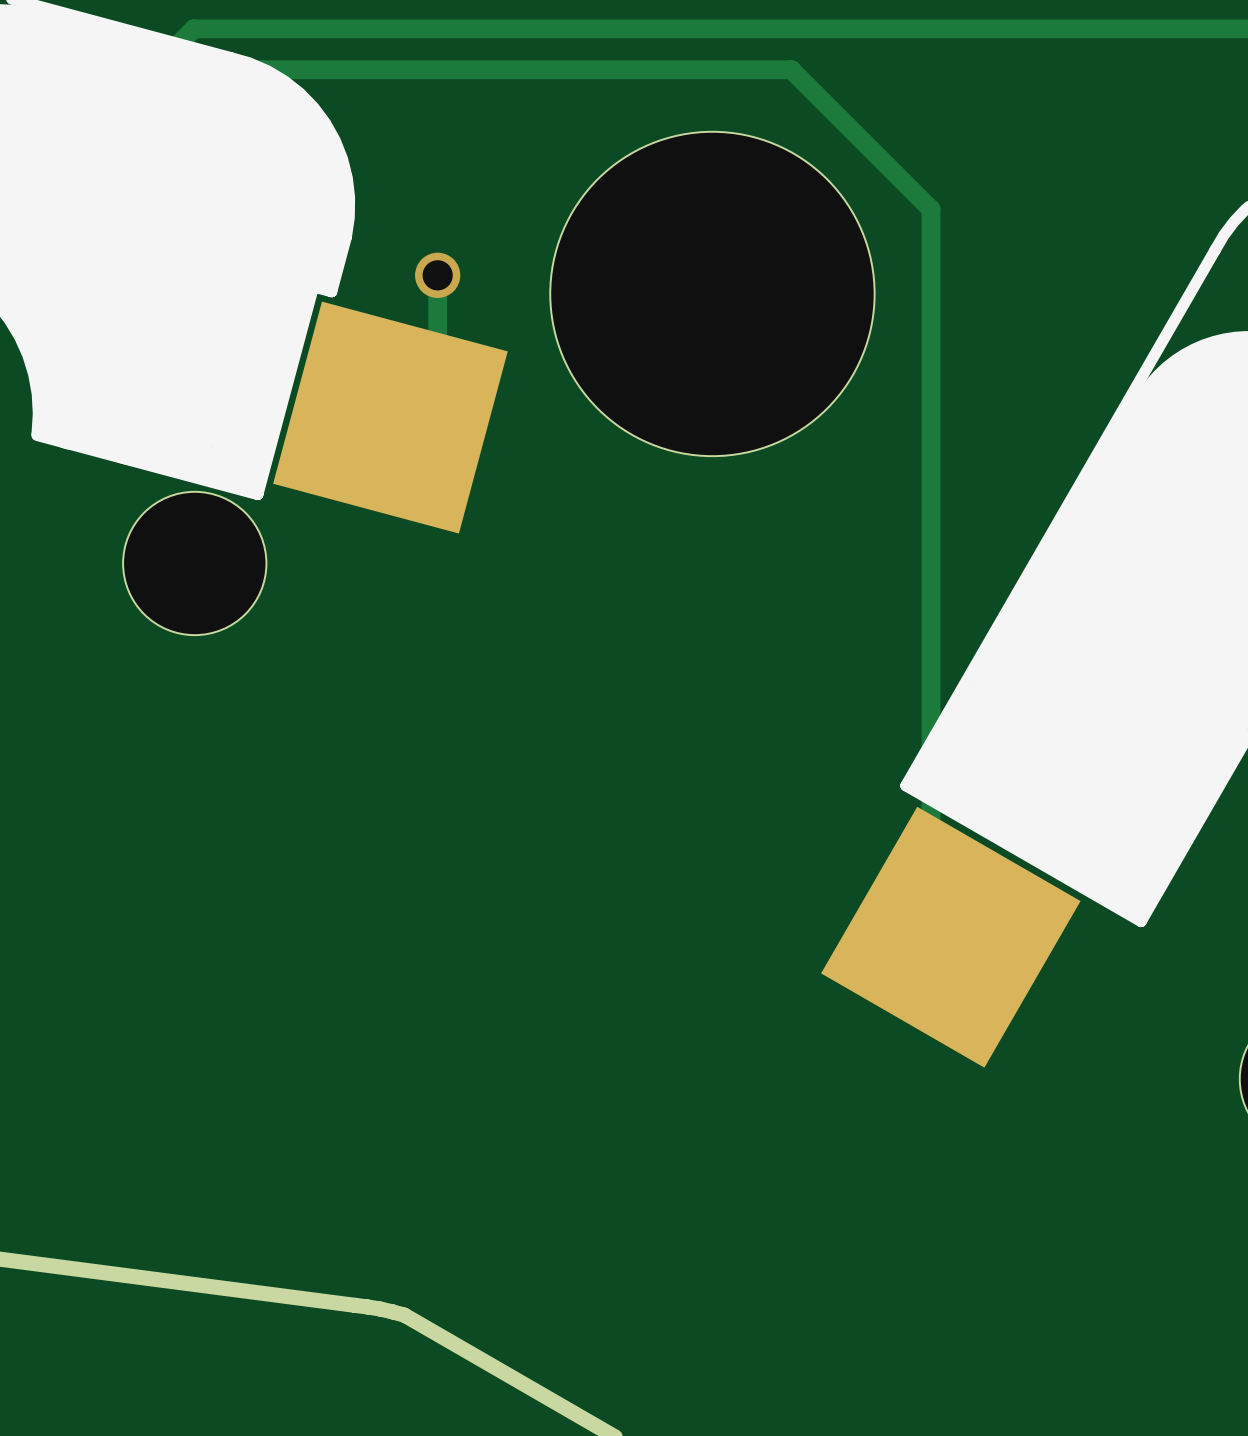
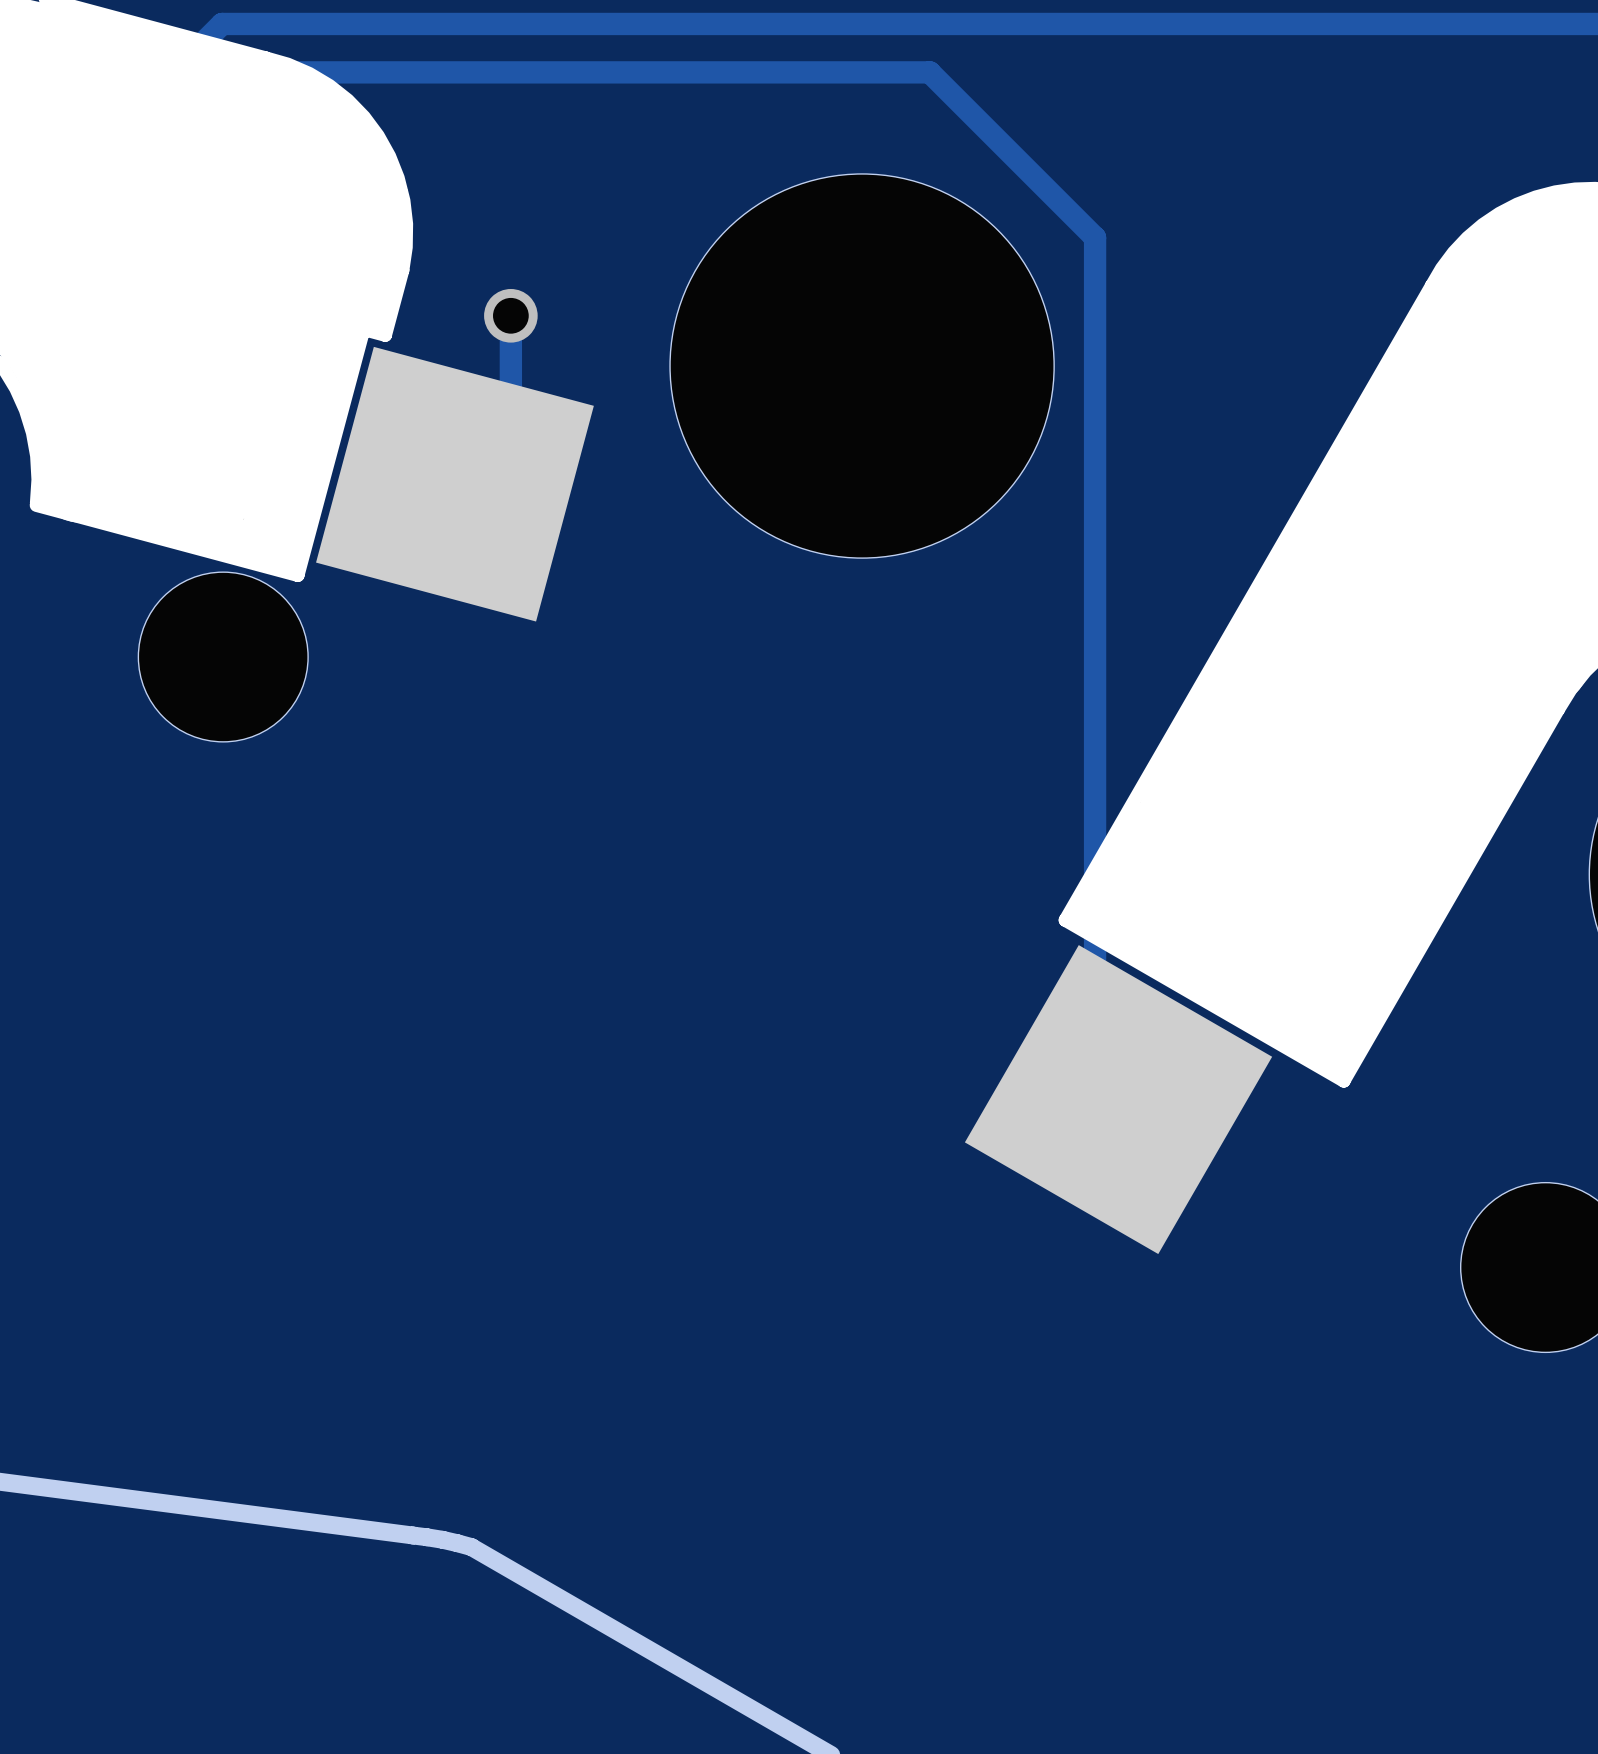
part position: (712, 293) -> (862, 366)

